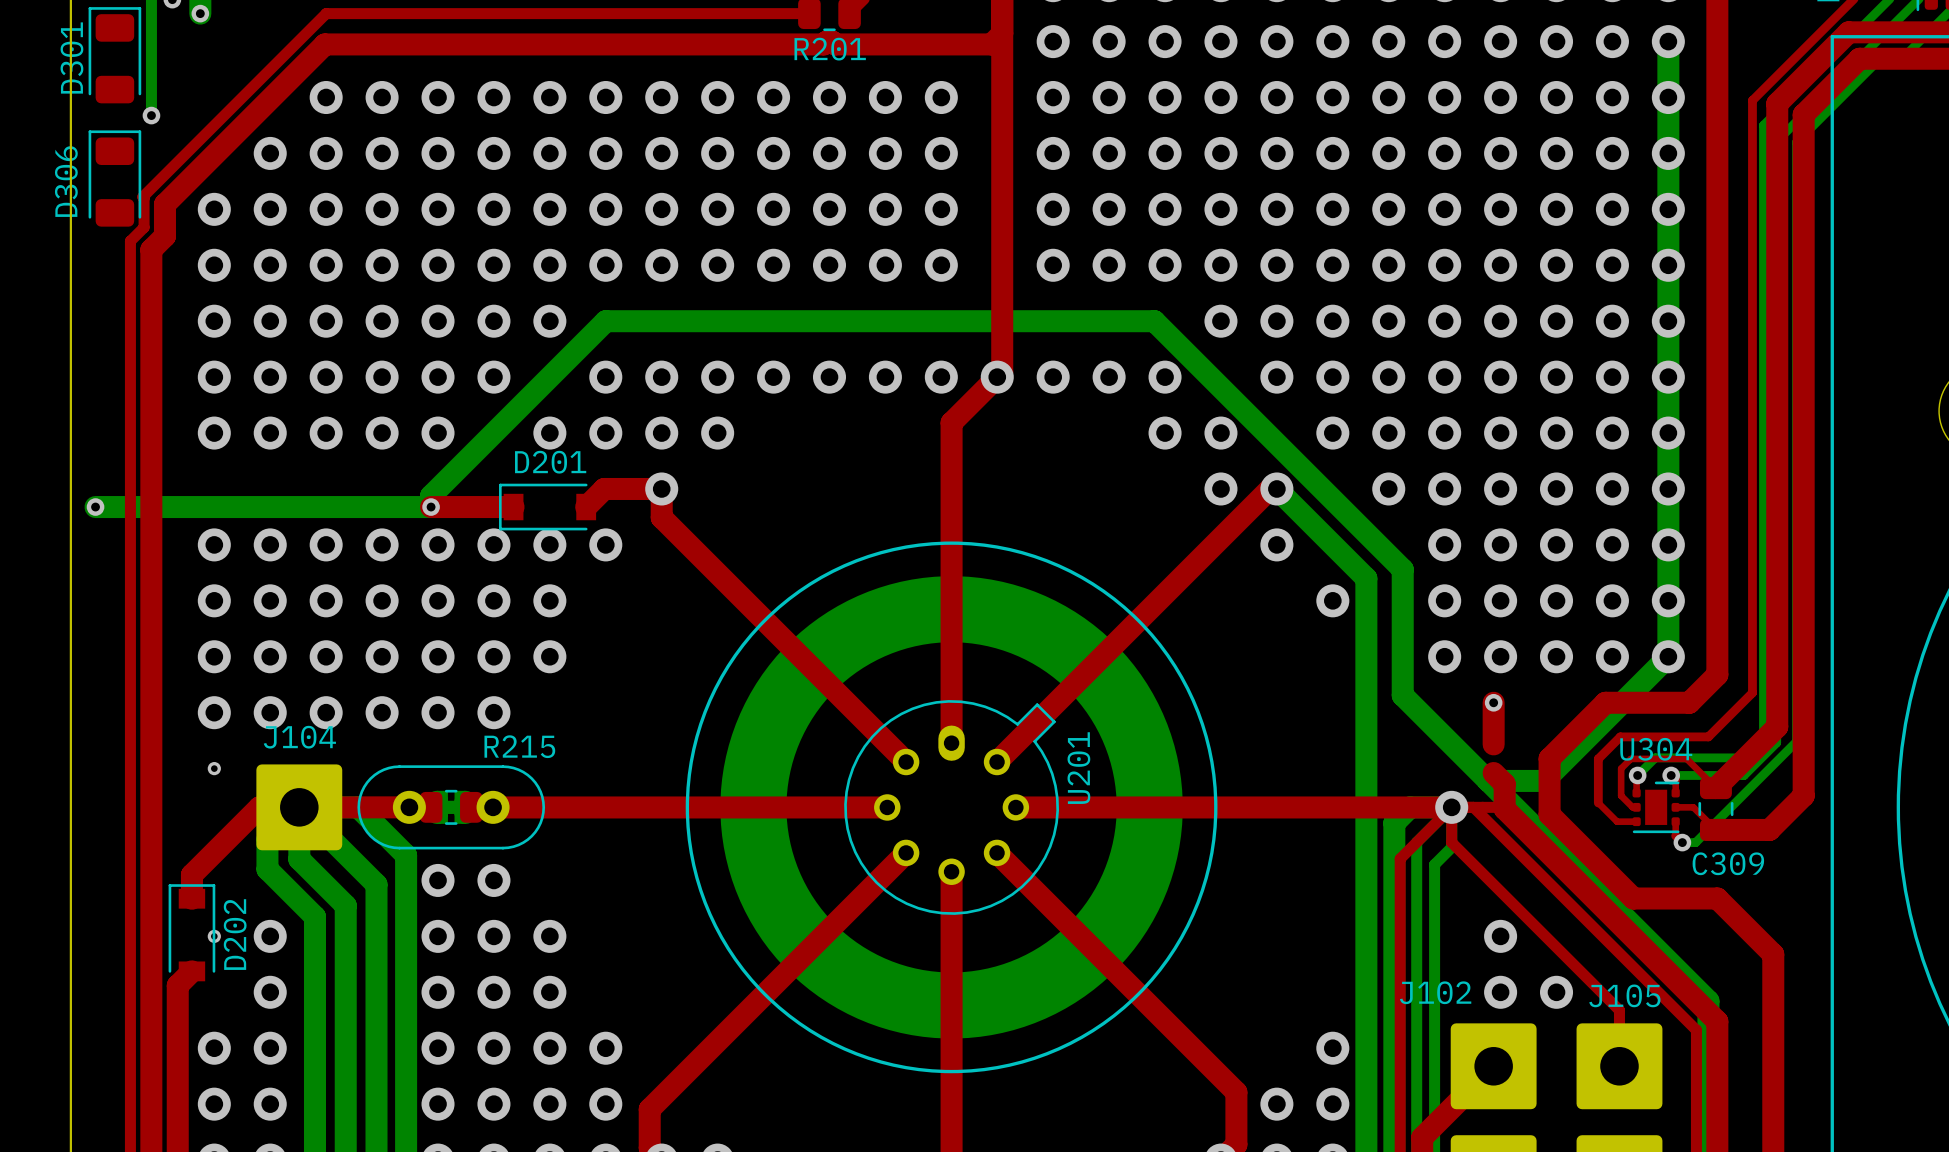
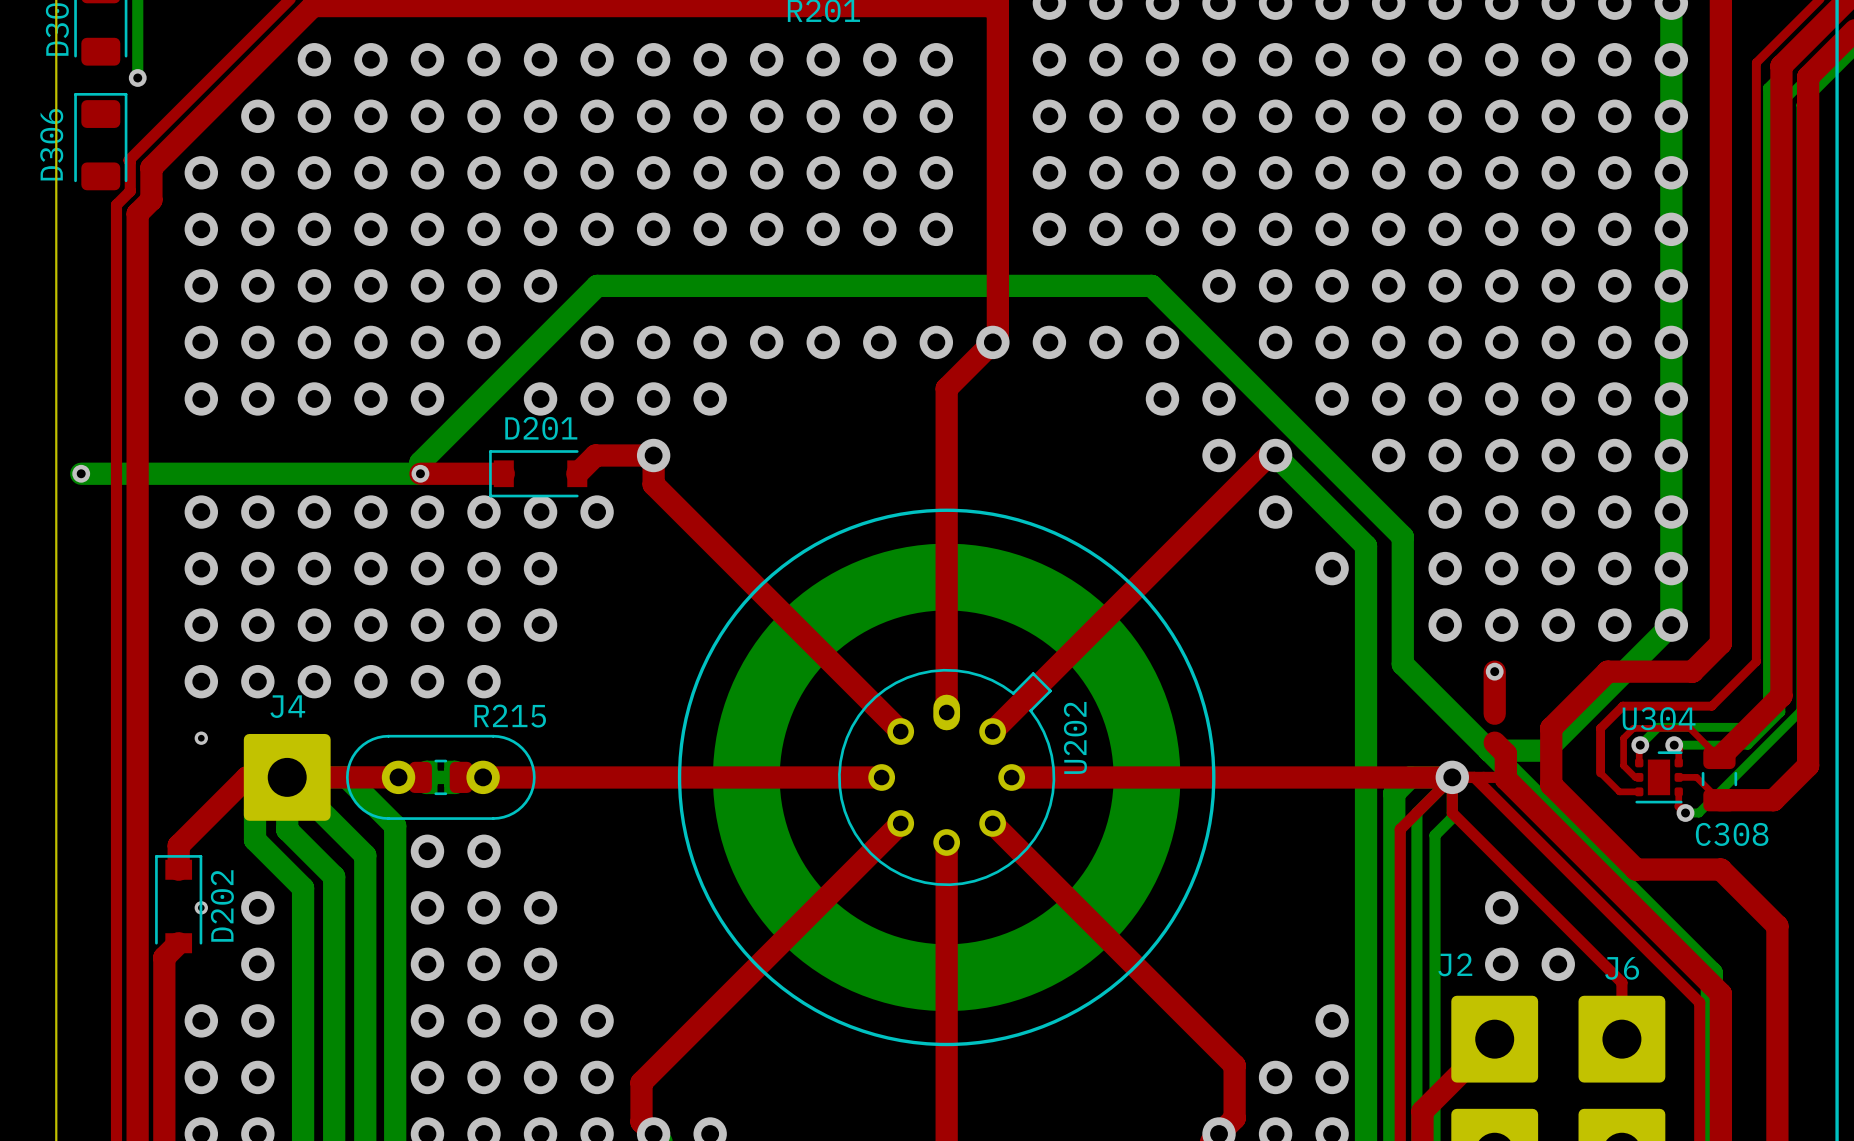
J104 name: J104 (299, 737) -> J4 (287, 706)
U201 name: U201 (1078, 768) -> U202 (1075, 737)
C309 name: C309 (1728, 863) -> C308 (1732, 834)
J102 name: J102 (1435, 992) -> J2 (1455, 964)
J105 name: J105 (1624, 995) -> J6 (1622, 968)

